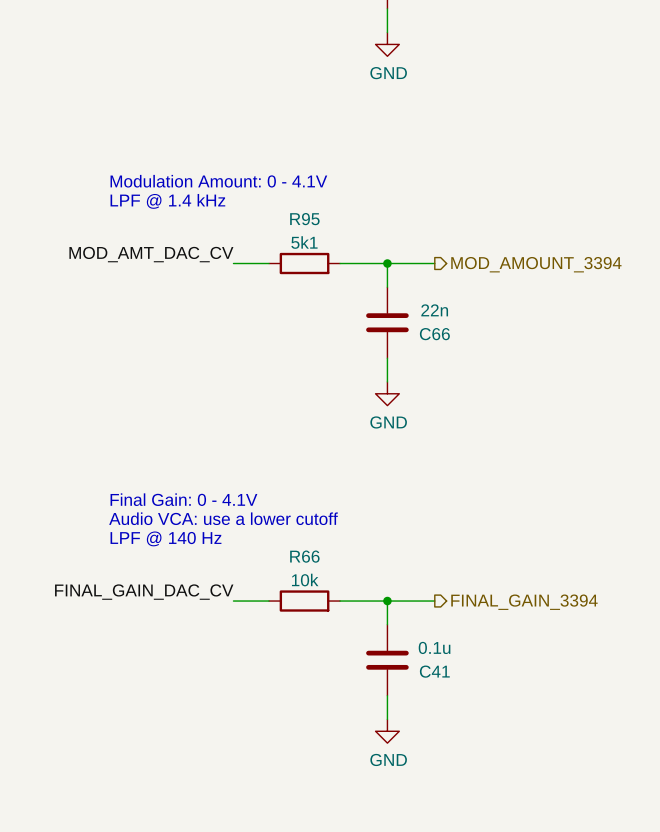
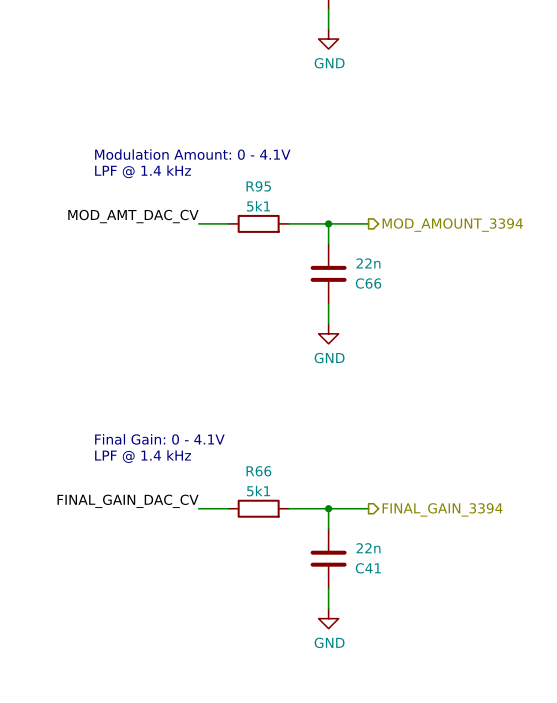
text: Final Gain: 0 - 4.1V (183, 499) -> none
text: Audio VCA: use a lower cutoff (223, 518) -> Final Gain: 0 - 4.1V (159, 439)
text: LPF @ 140 Hz (165, 538) -> LPF @ 1.4 kHz (143, 456)
R66 value: 10k (305, 580) -> 5k1 (258, 491)
C41 value: 0.1u (434, 647) -> 22n (368, 548)

